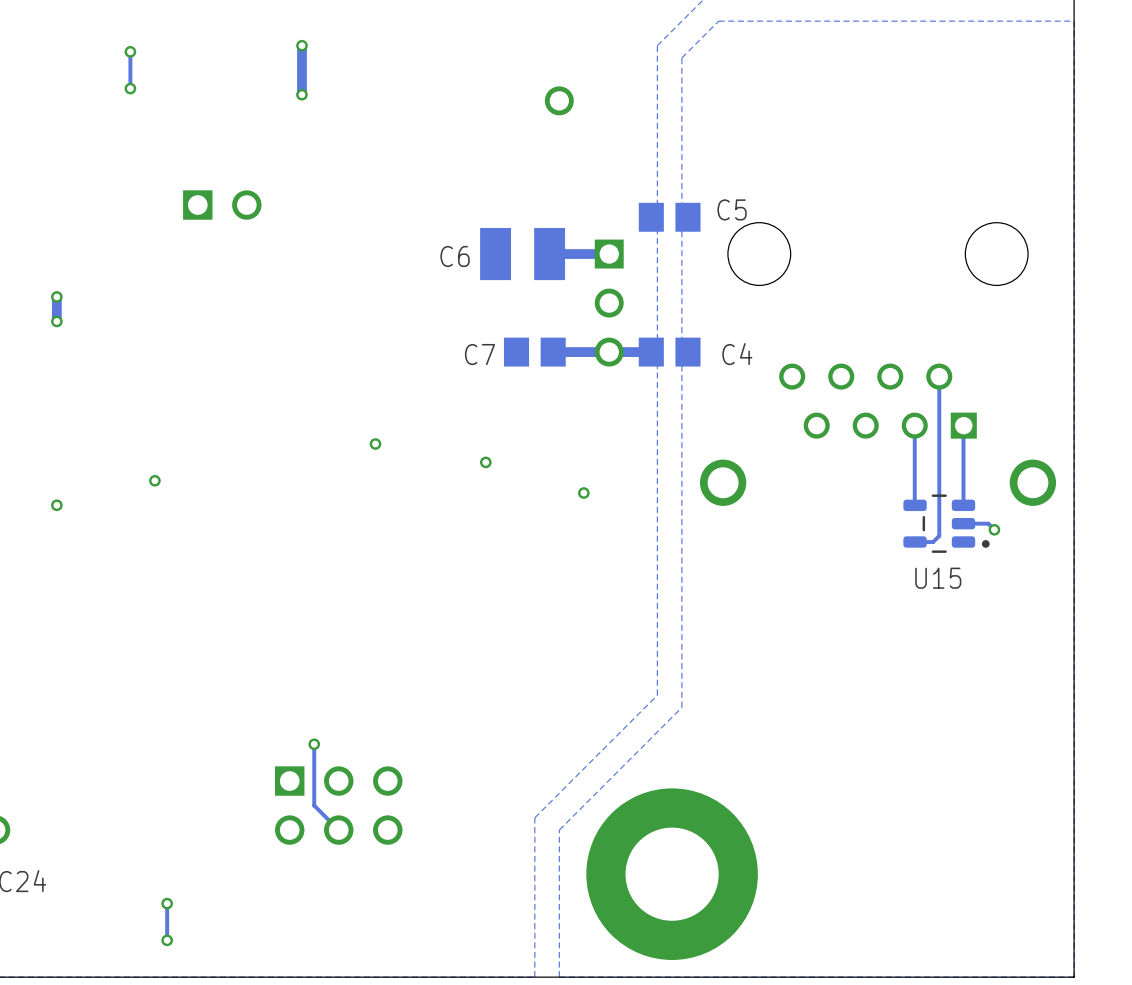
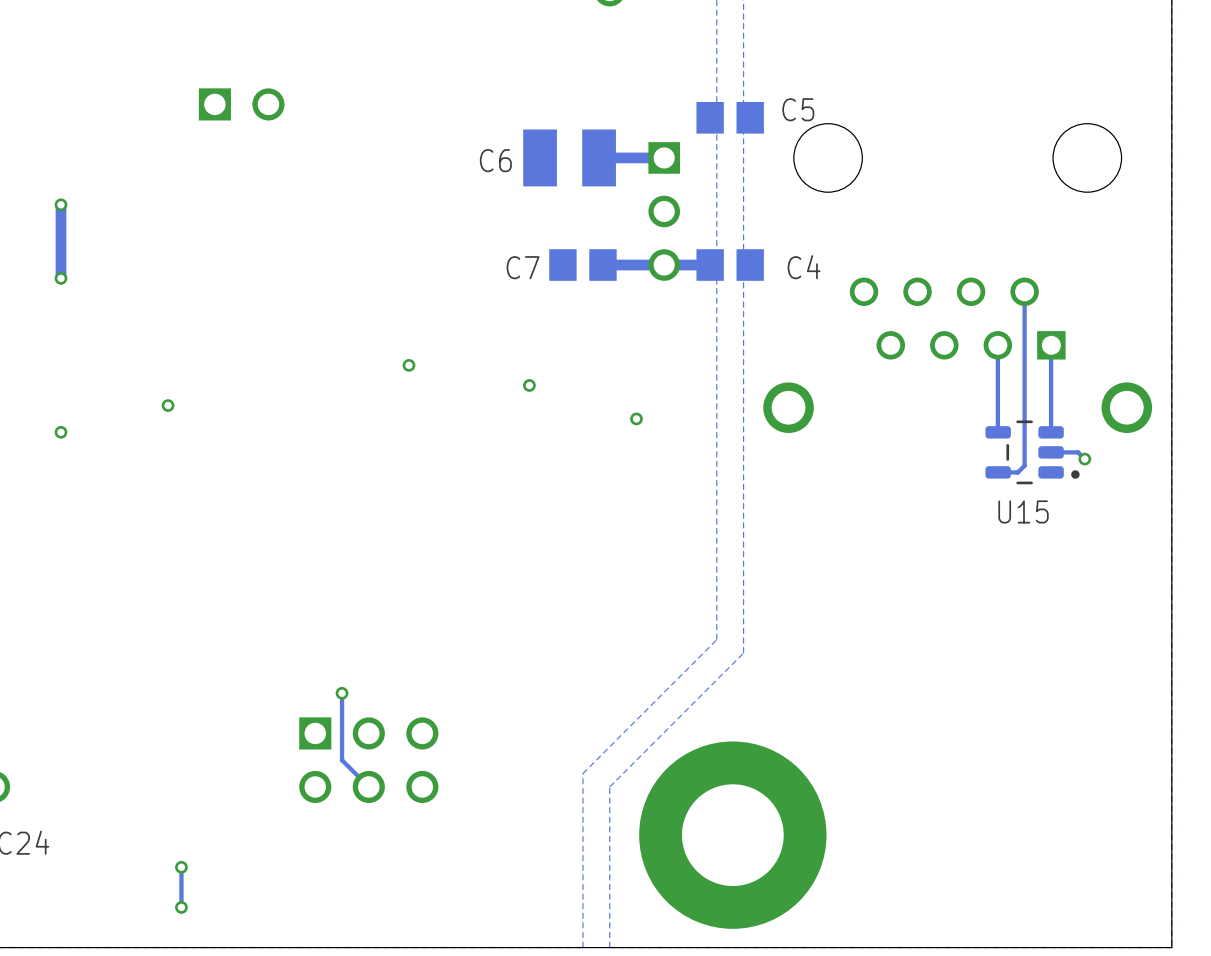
track: none -> (60, 231) (60, 278)
via position: (56, 321) -> (60, 278)

